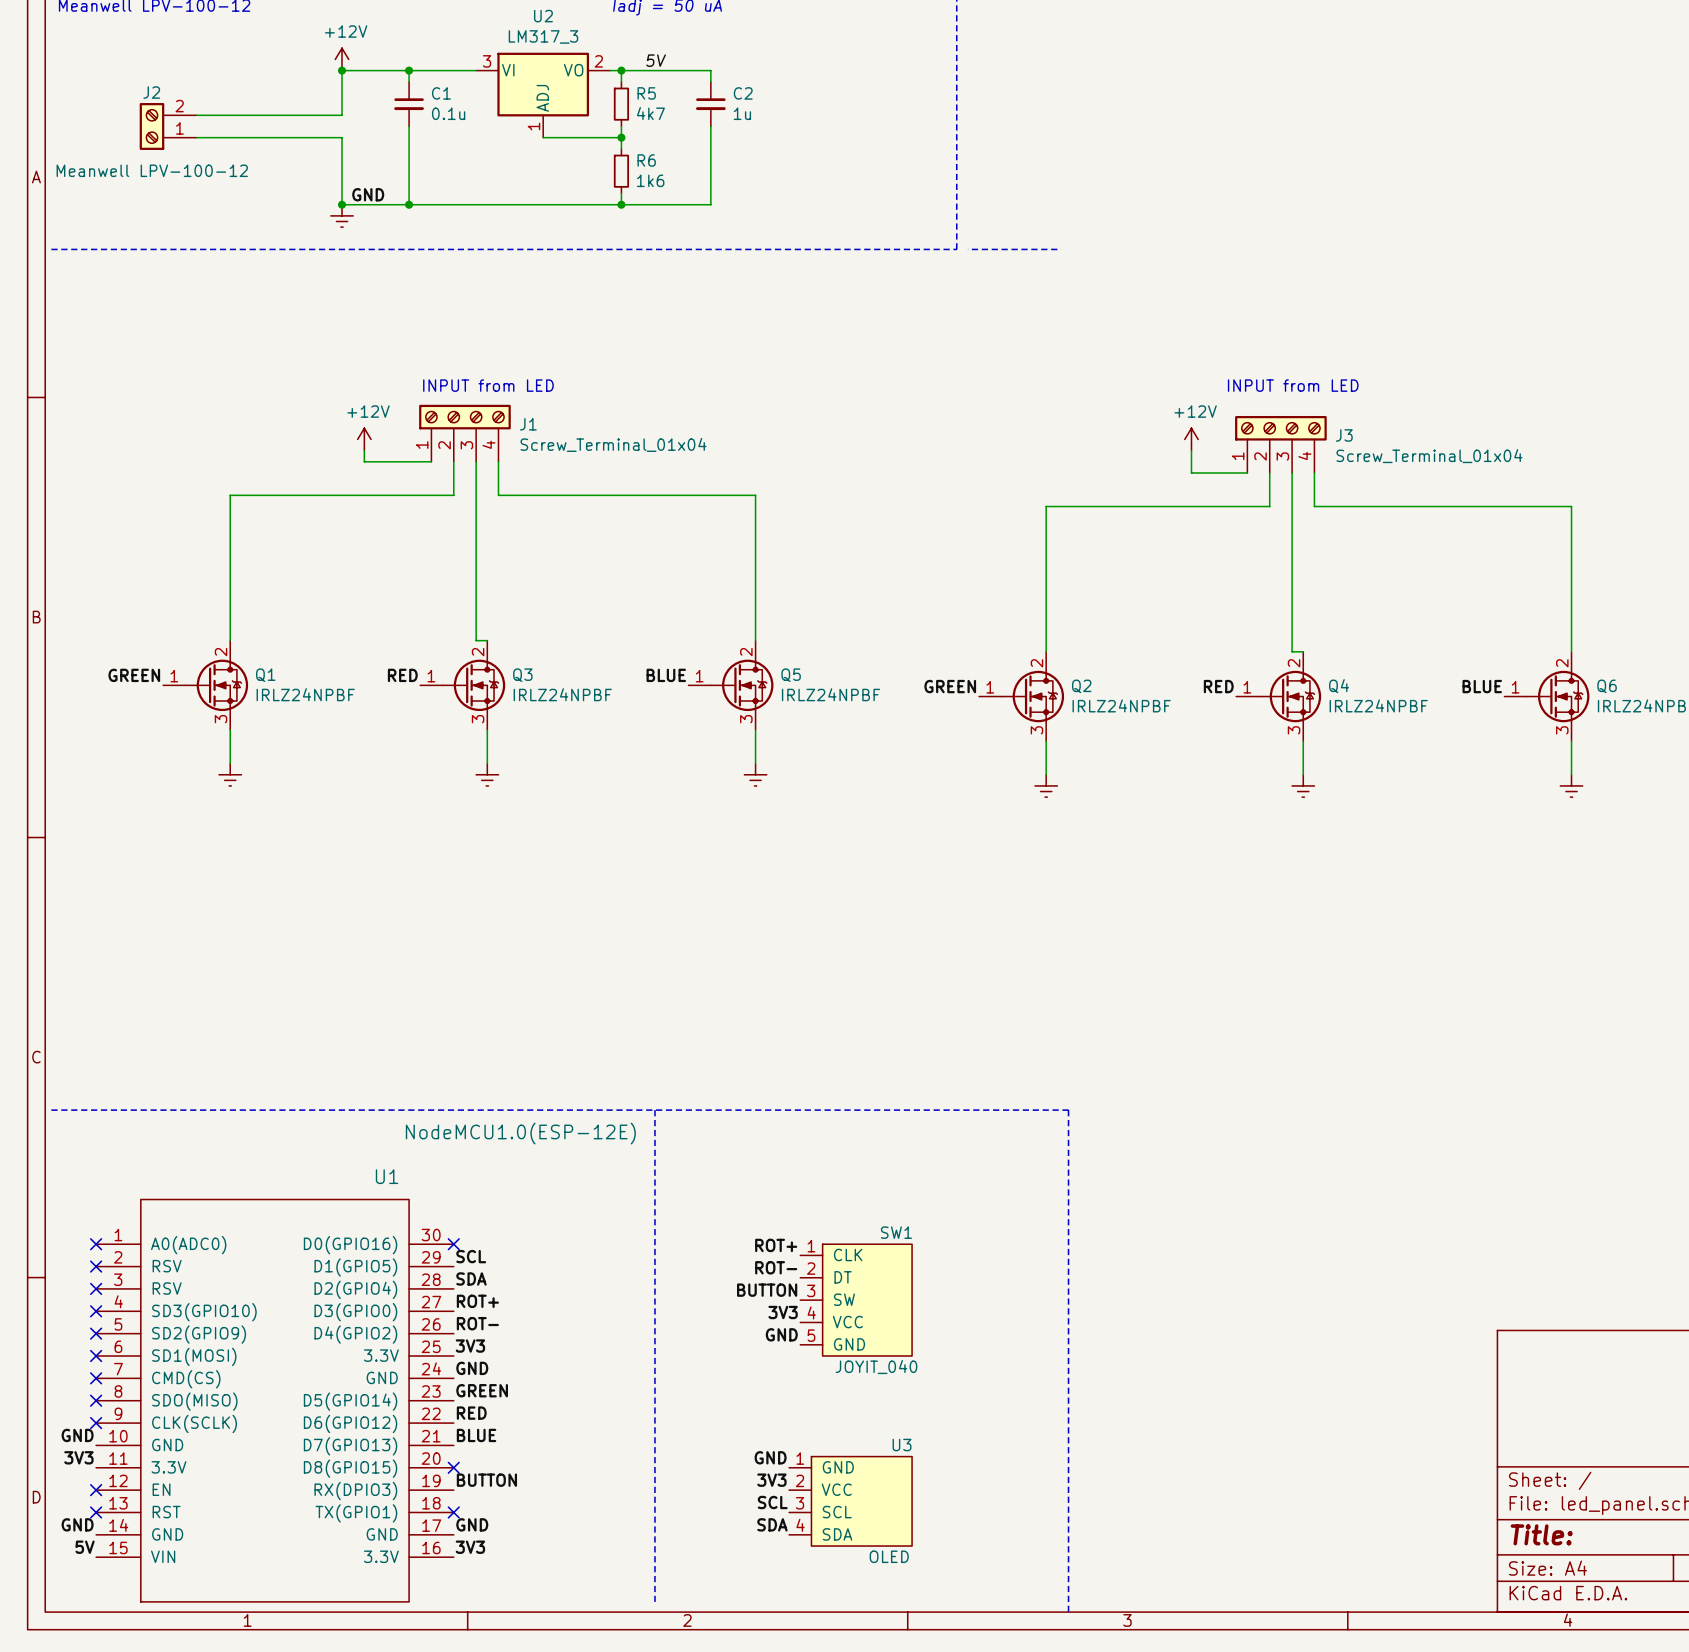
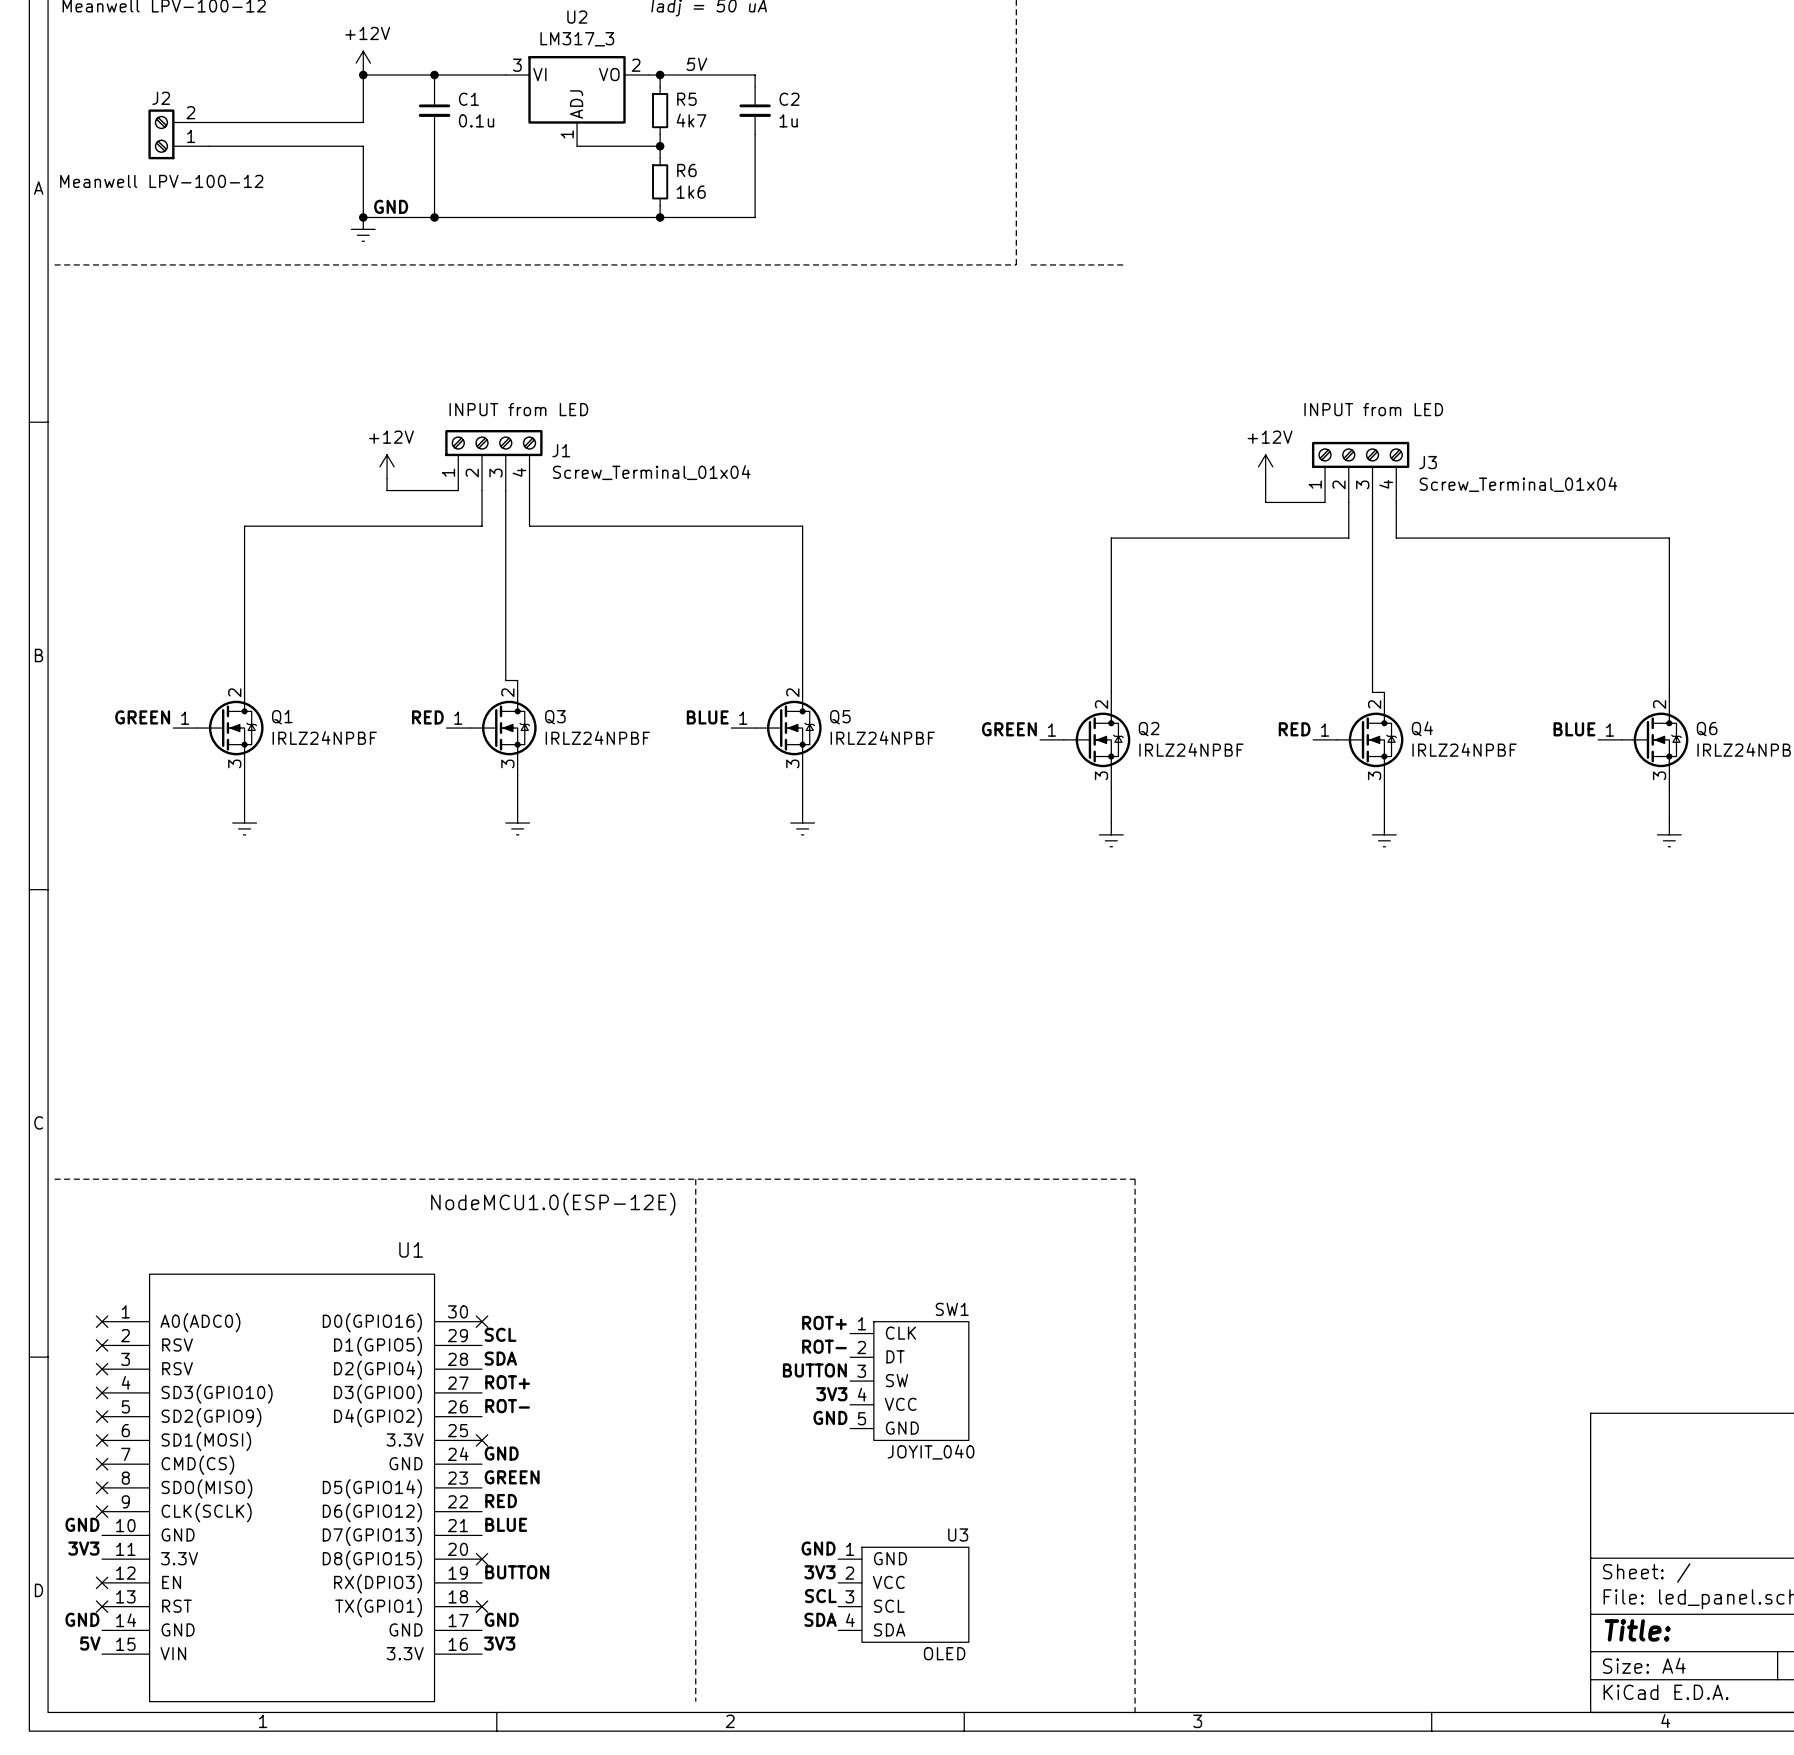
label: 3V3 (470, 1346) -> none
no-connect mark: none -> (482, 1440)

